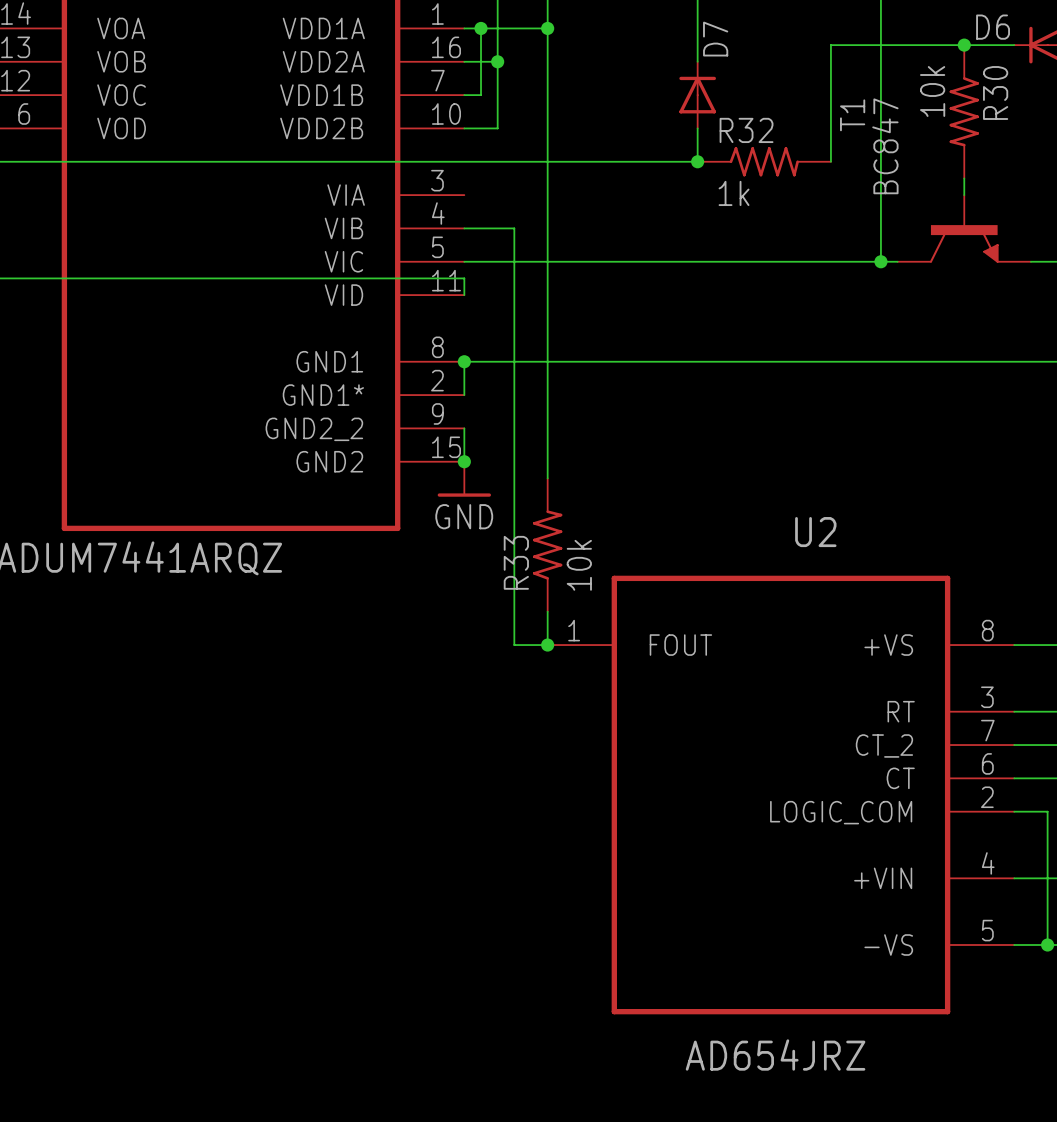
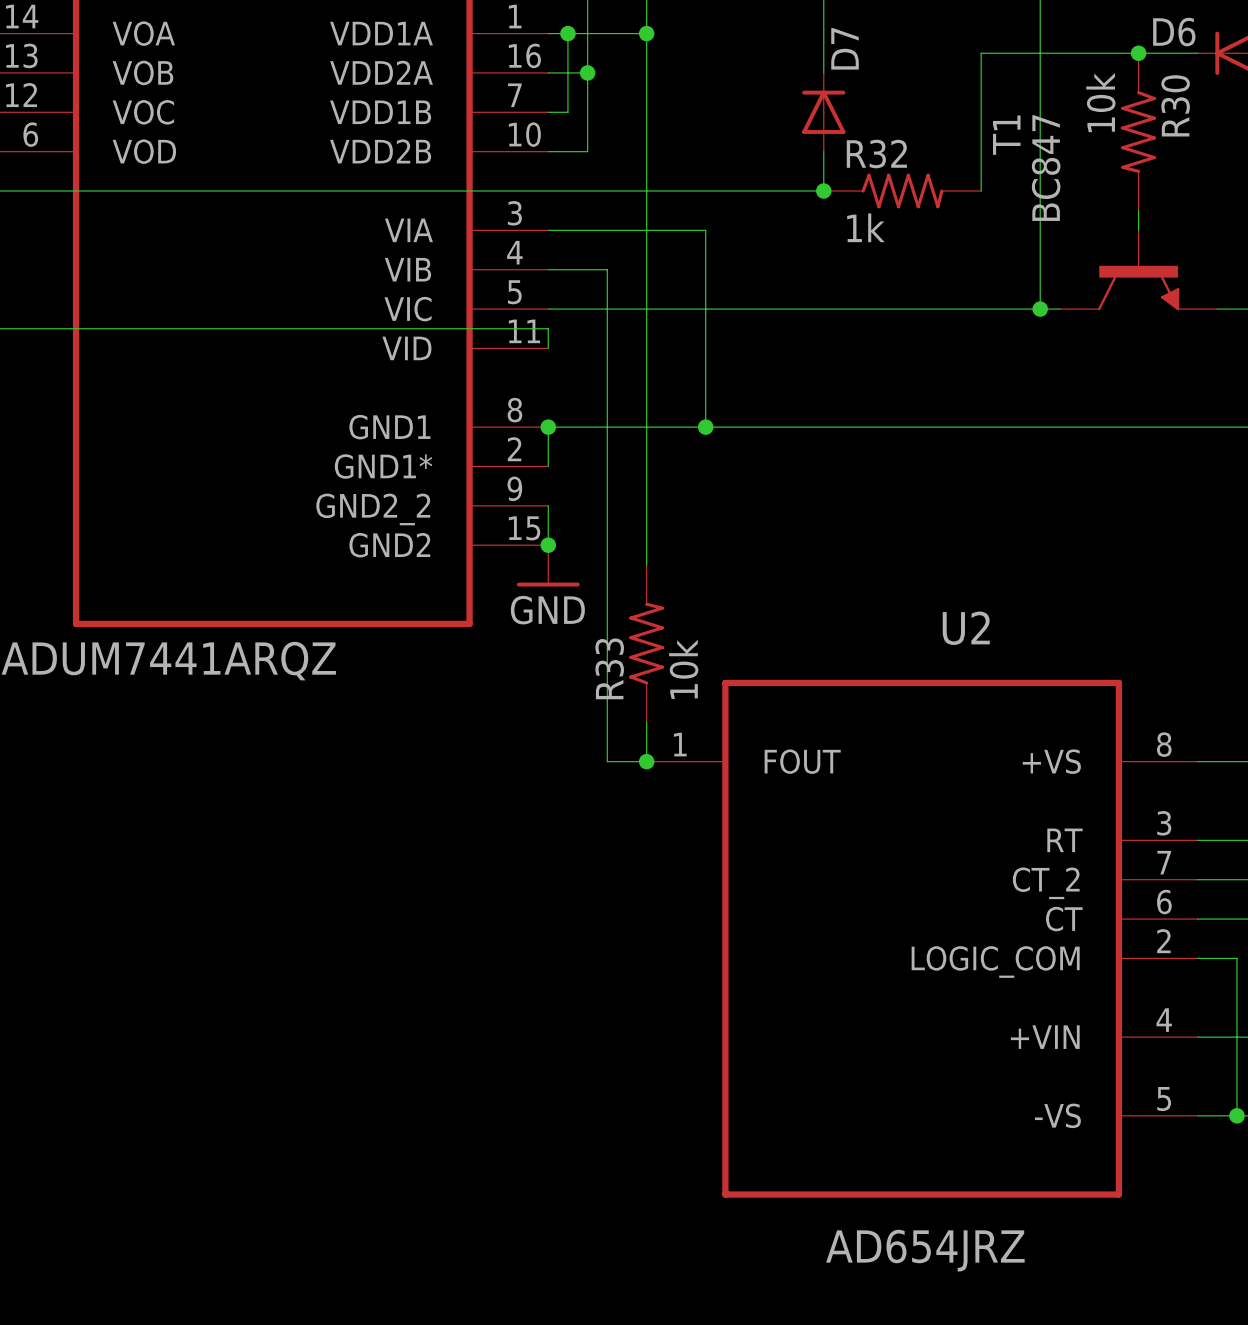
wire: none -> (548, 230) (705, 230) (705, 427)
junction: none -> (705, 427)

